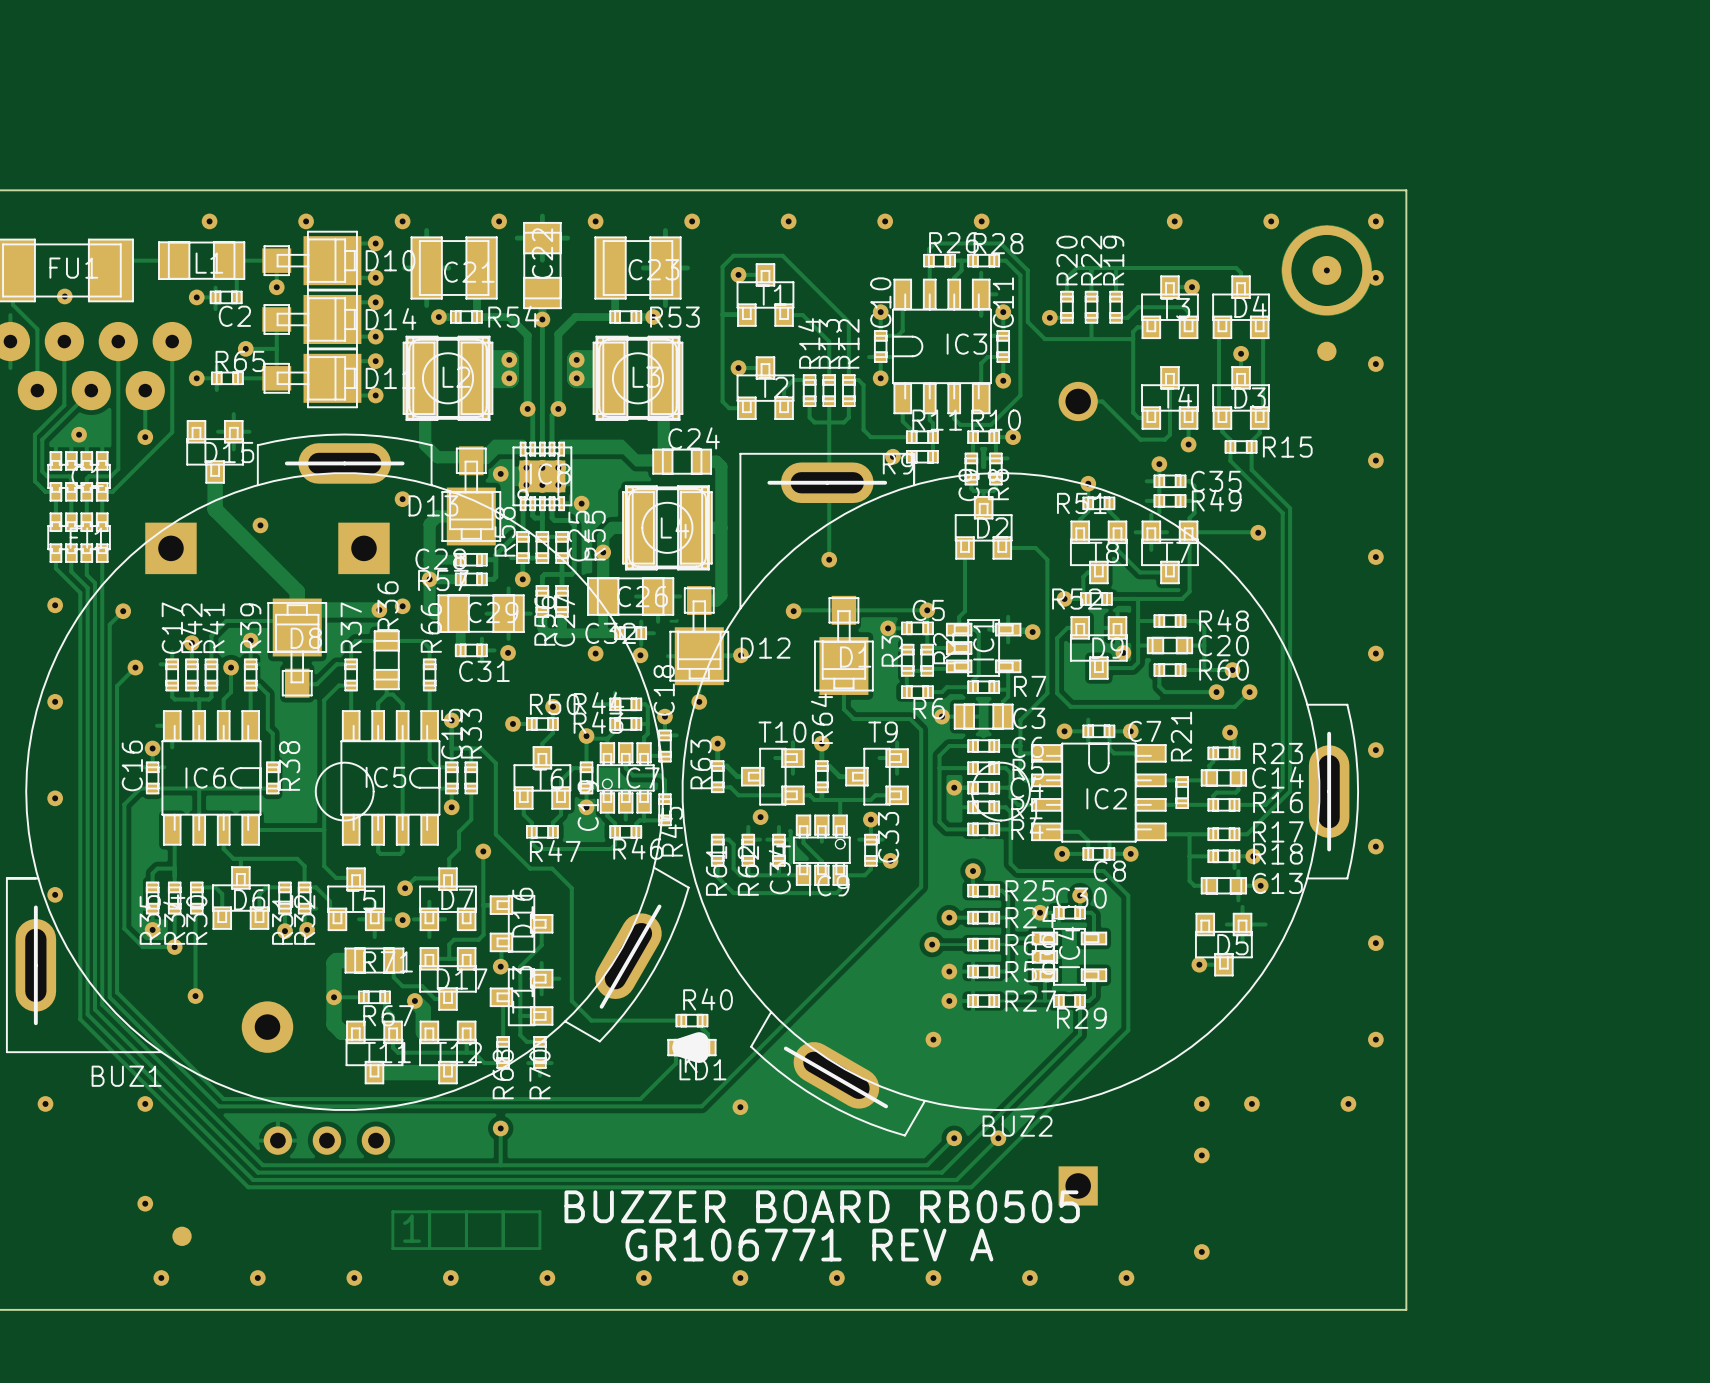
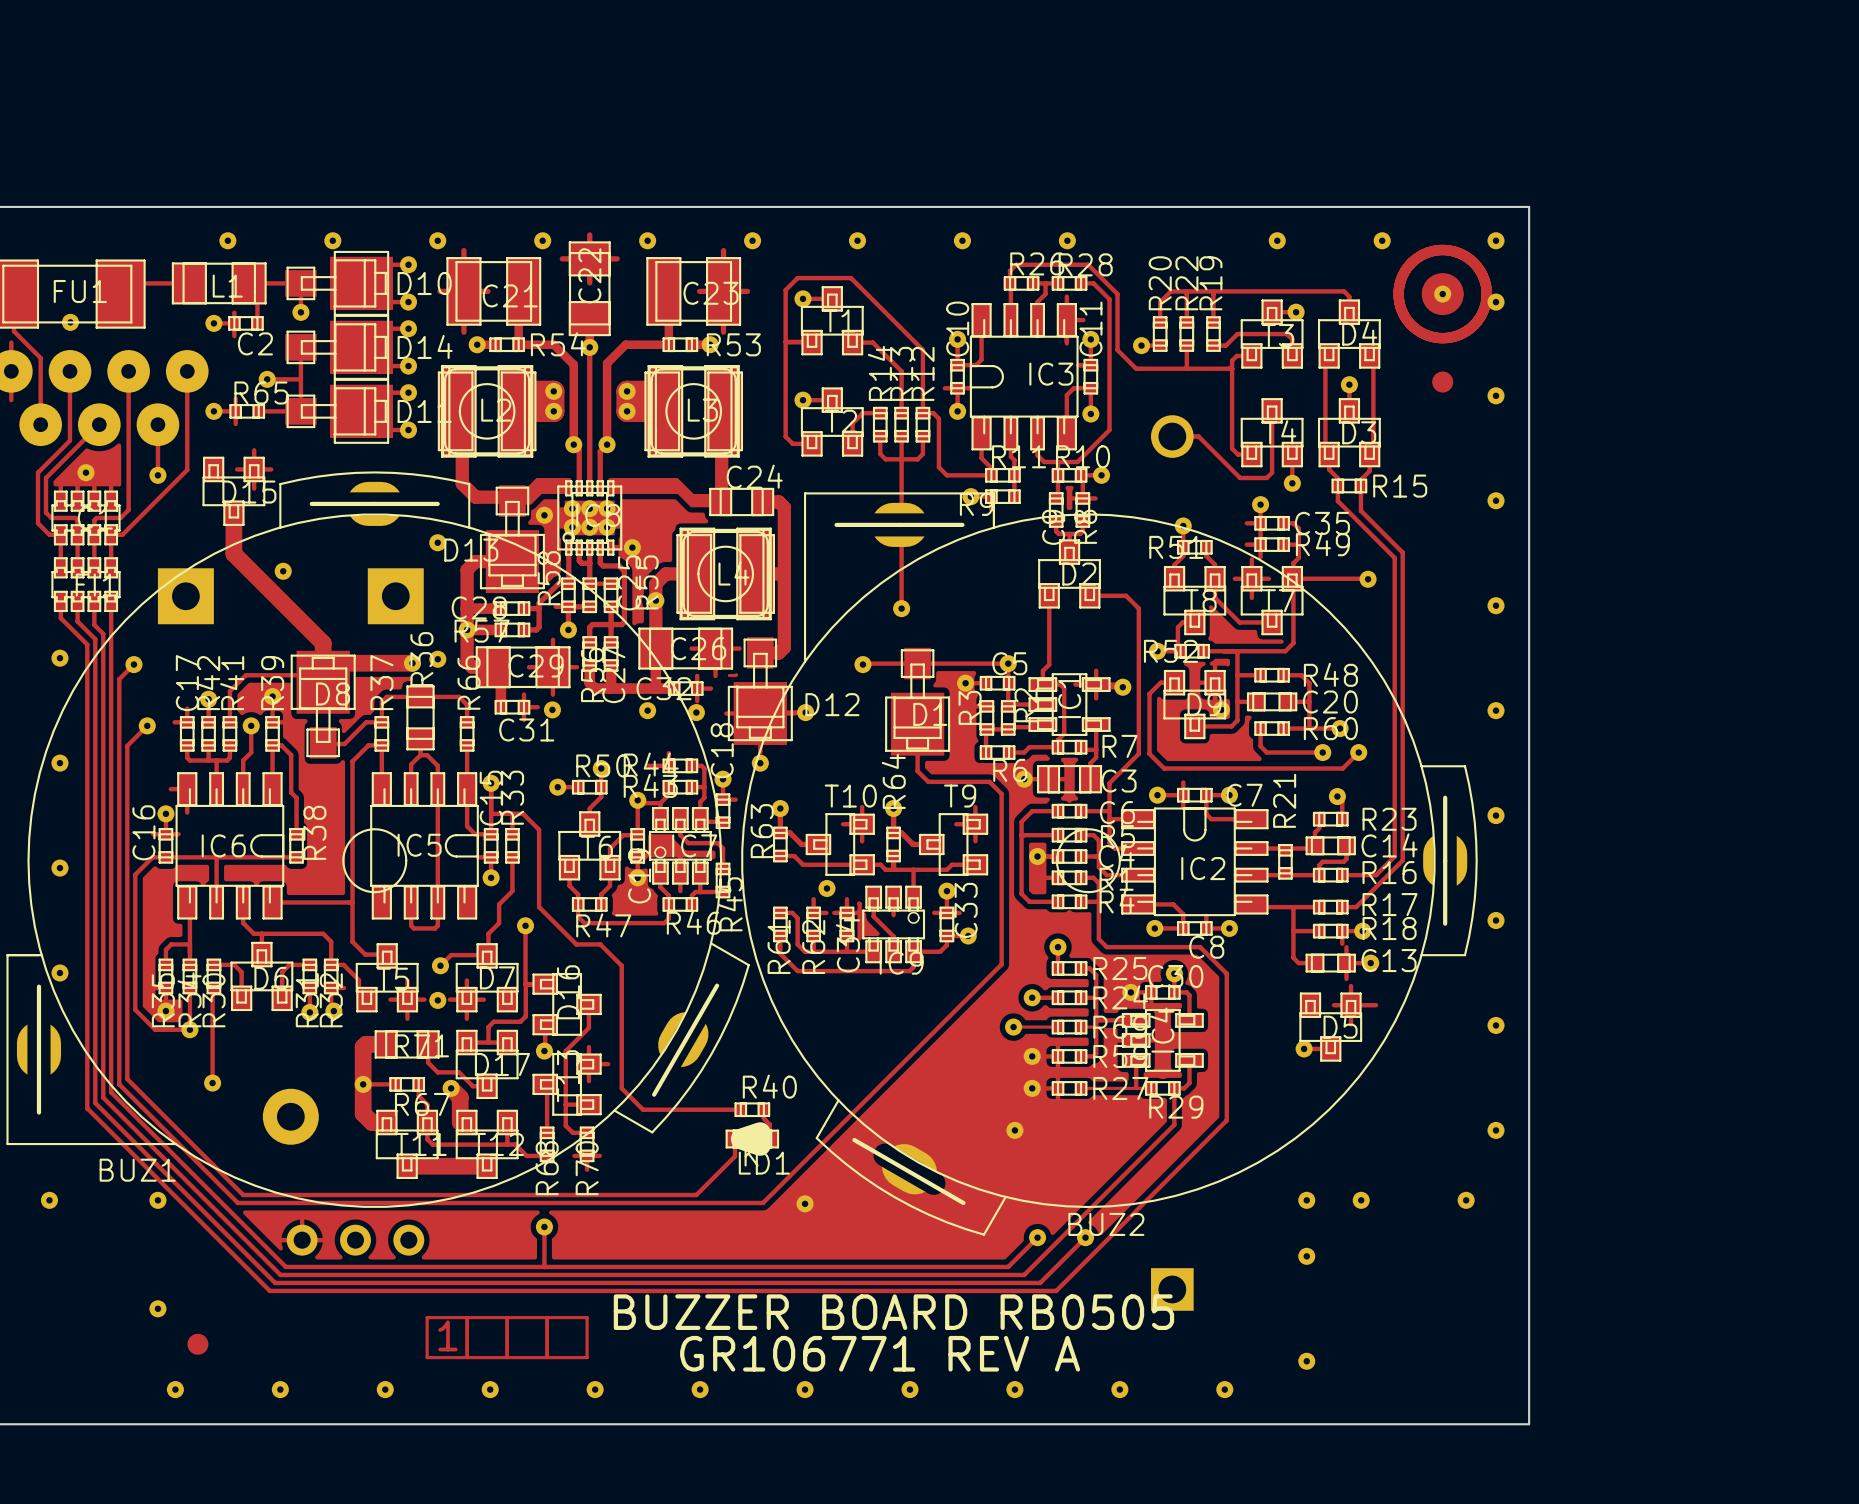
part footprint: [1281, 225, 1372, 316] -> [1421, 273, 1464, 316]
BUZ1 footprint: [5, 433, 690, 1111] -> [6, 471, 750, 1208]
BUZ2 footprint: [681, 452, 1360, 1137] -> [741, 492, 1478, 1236]

